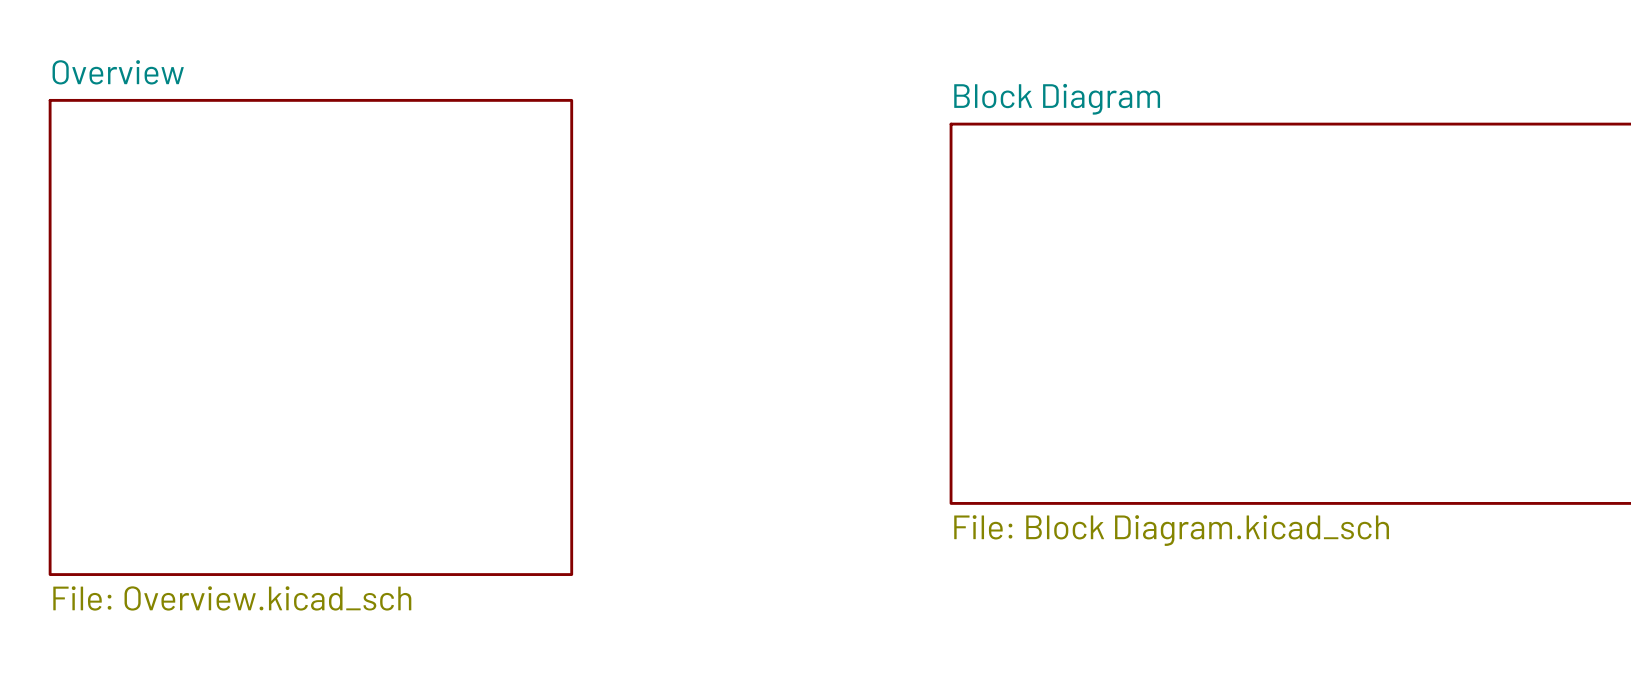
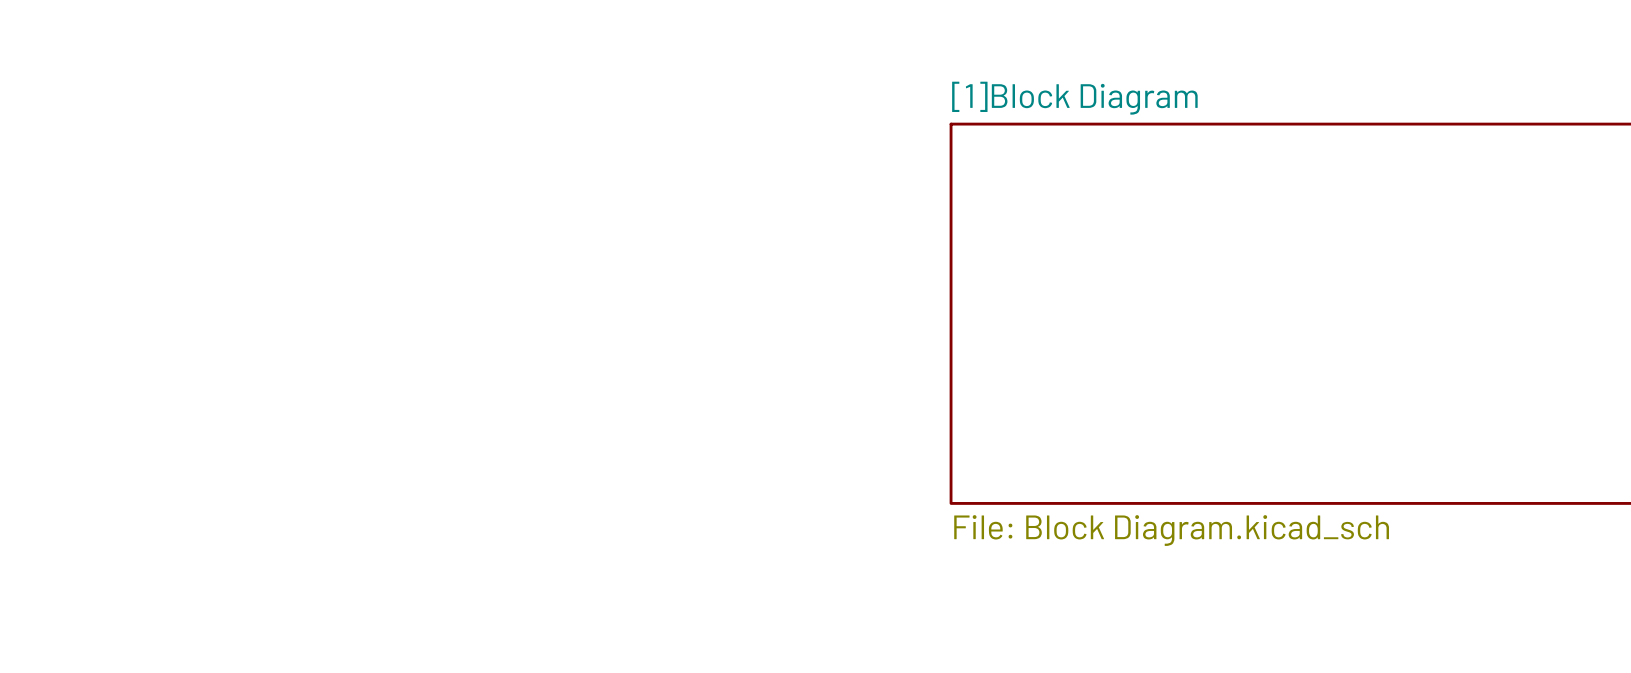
sheet Block Diagram name: Block Diagram (1057, 99) -> [1]Block Diagram (1074, 98)
sheet Overview: File: Overview.kicad_sch (310, 337) -> none

